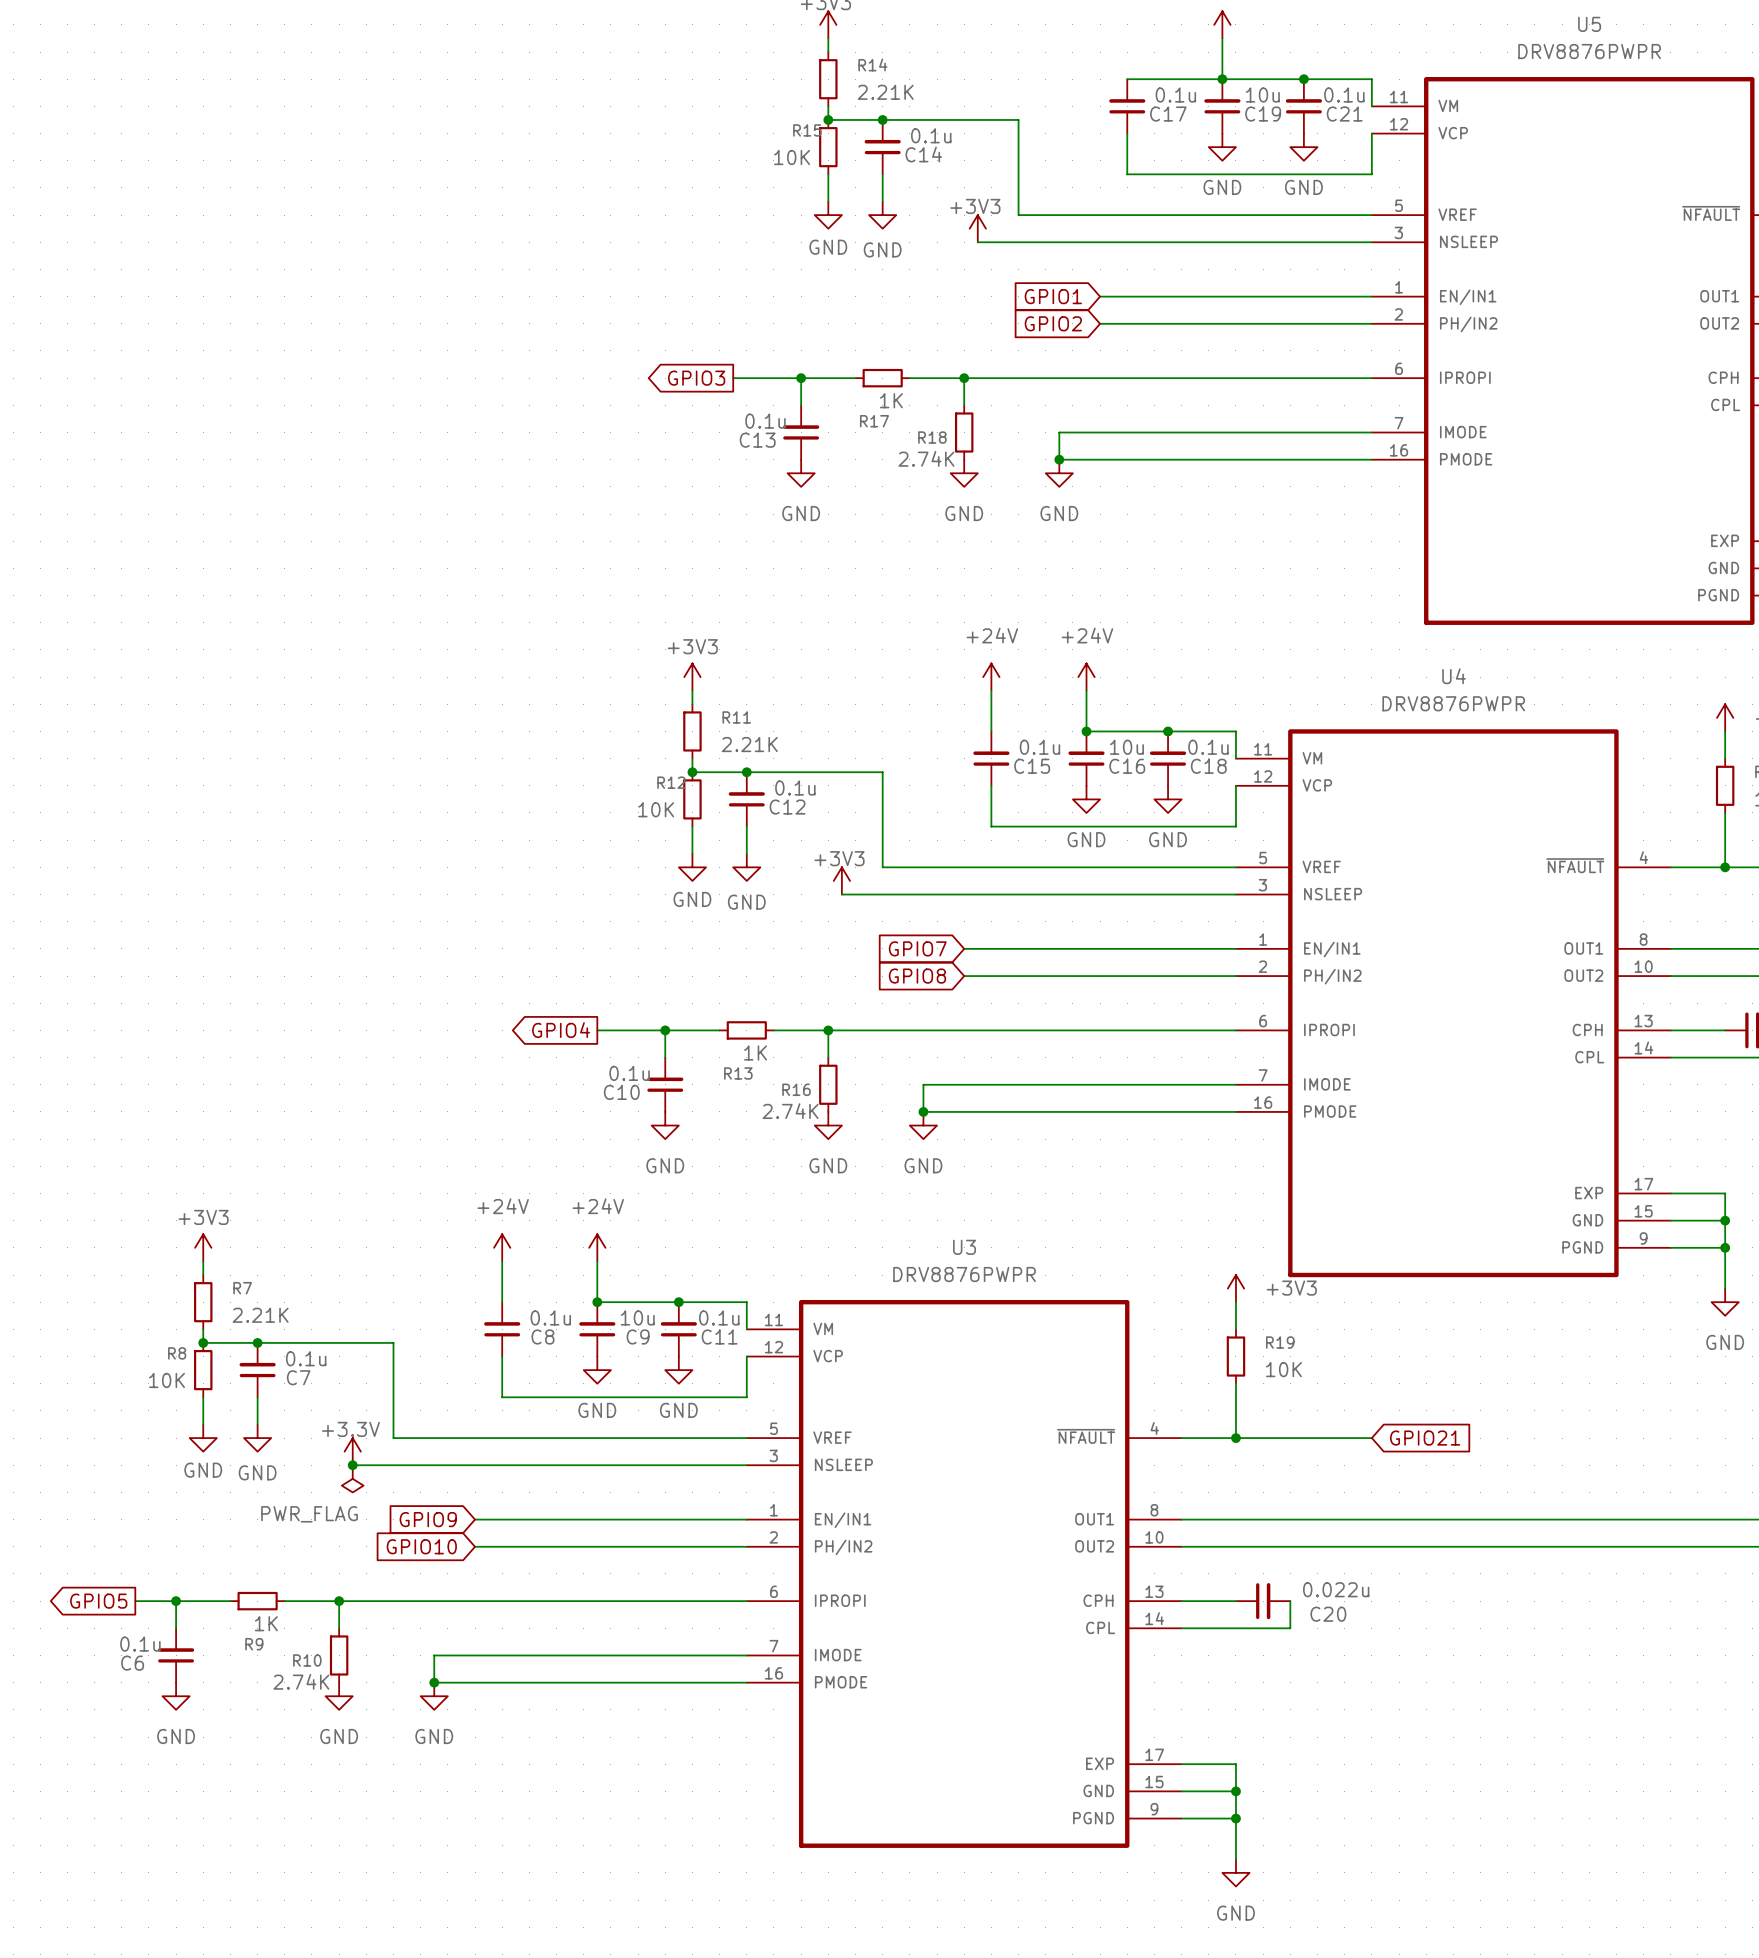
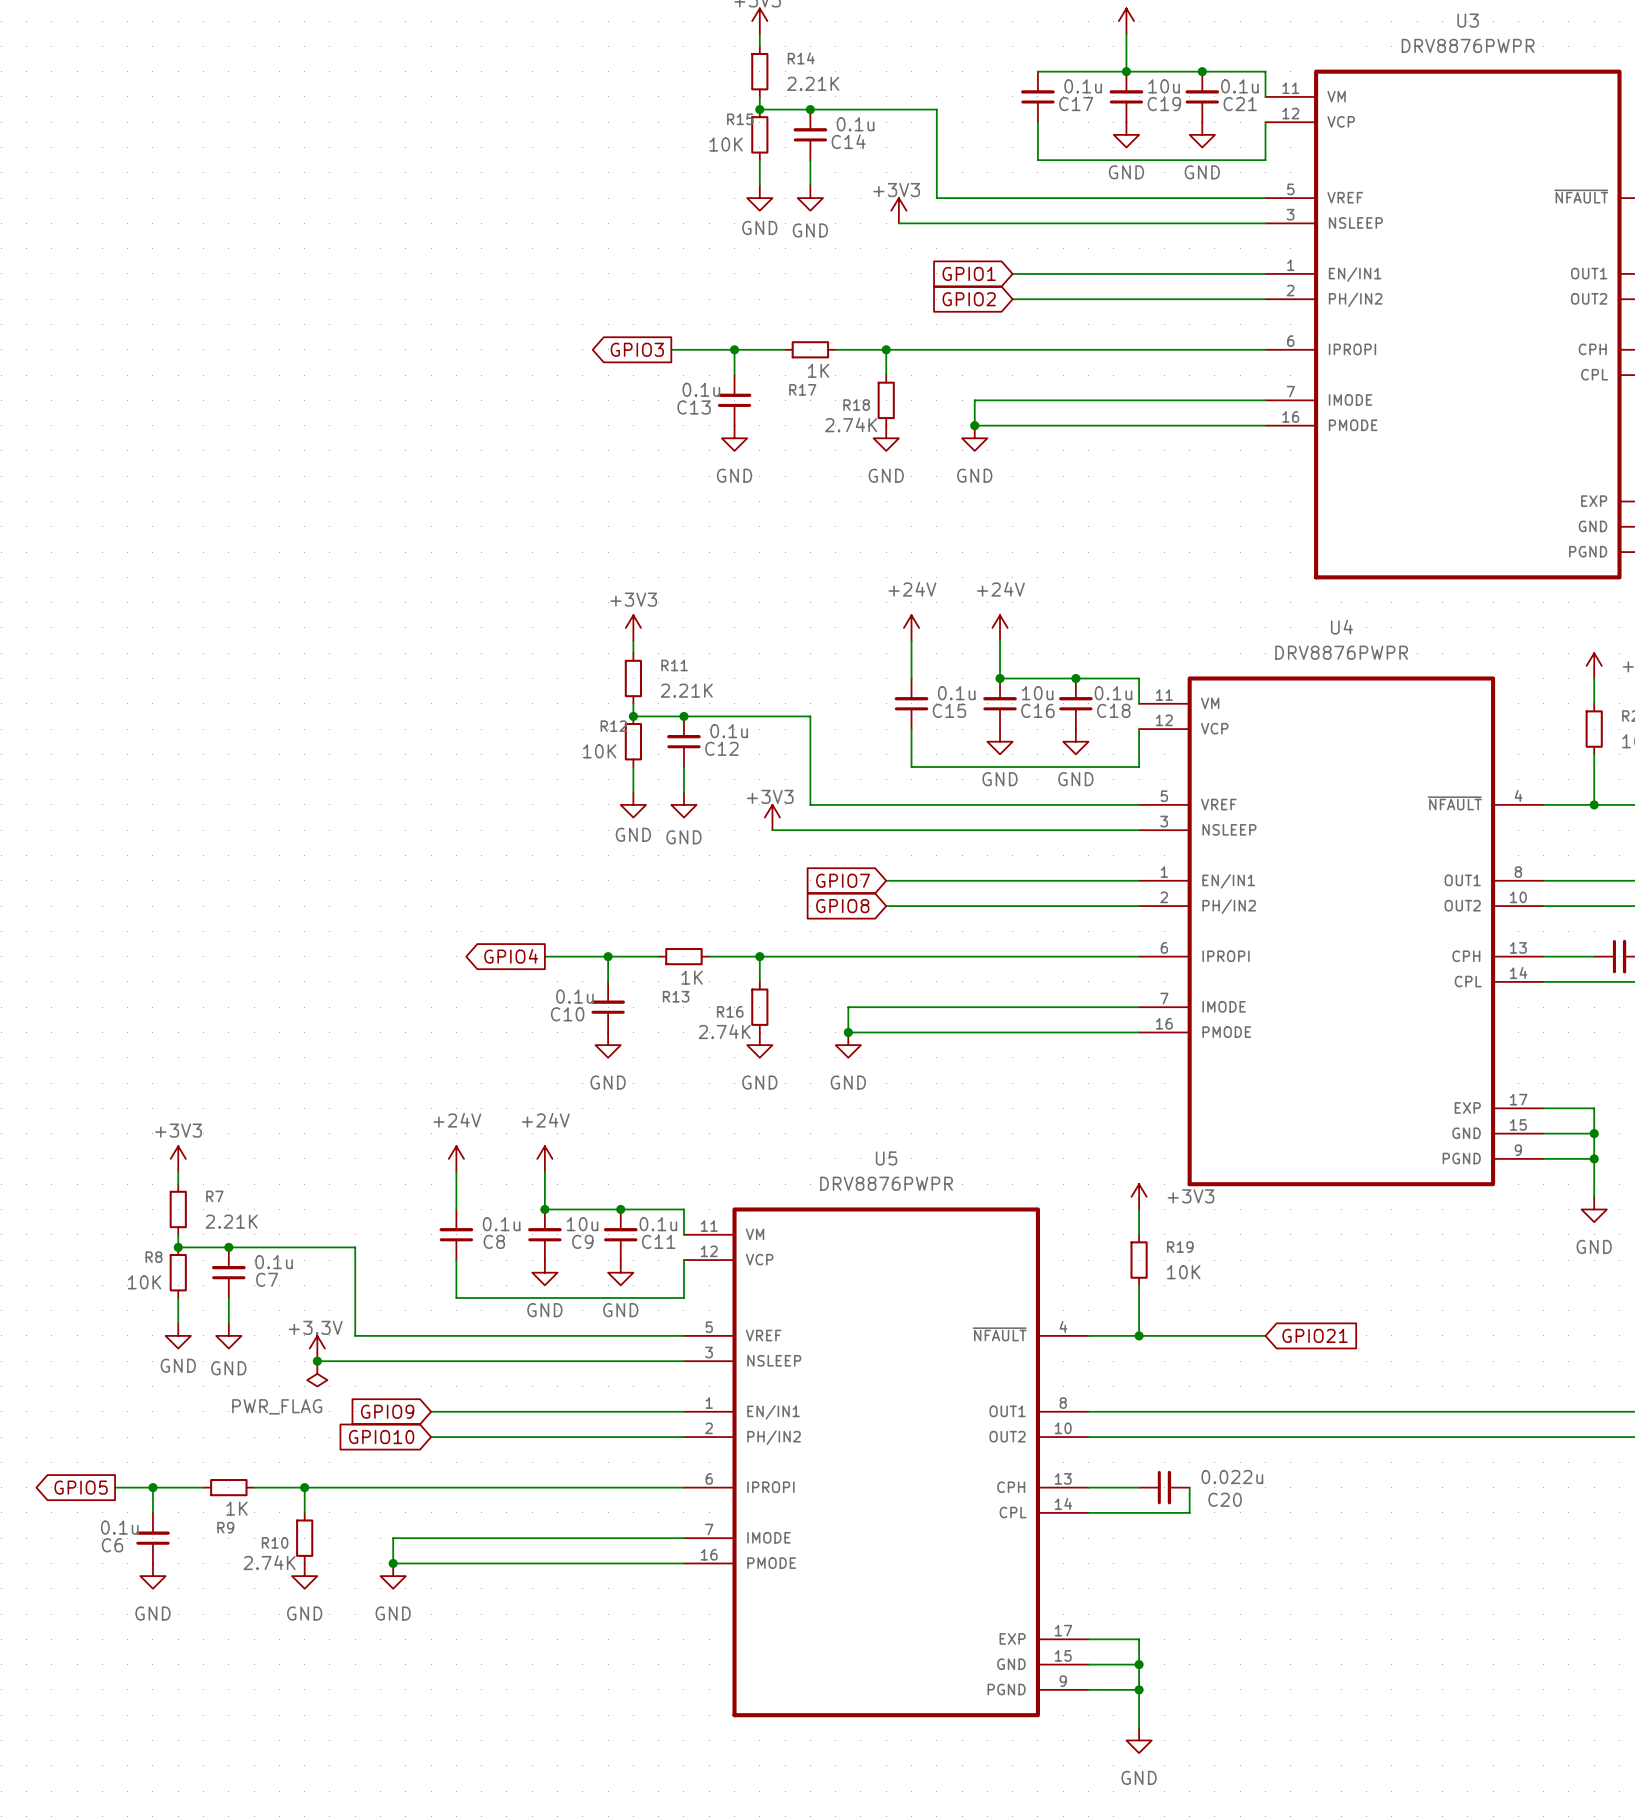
U5 name: U5 (1589, 24) -> U3 (1468, 20)
U3 name: U3 (964, 1247) -> U5 (886, 1158)

